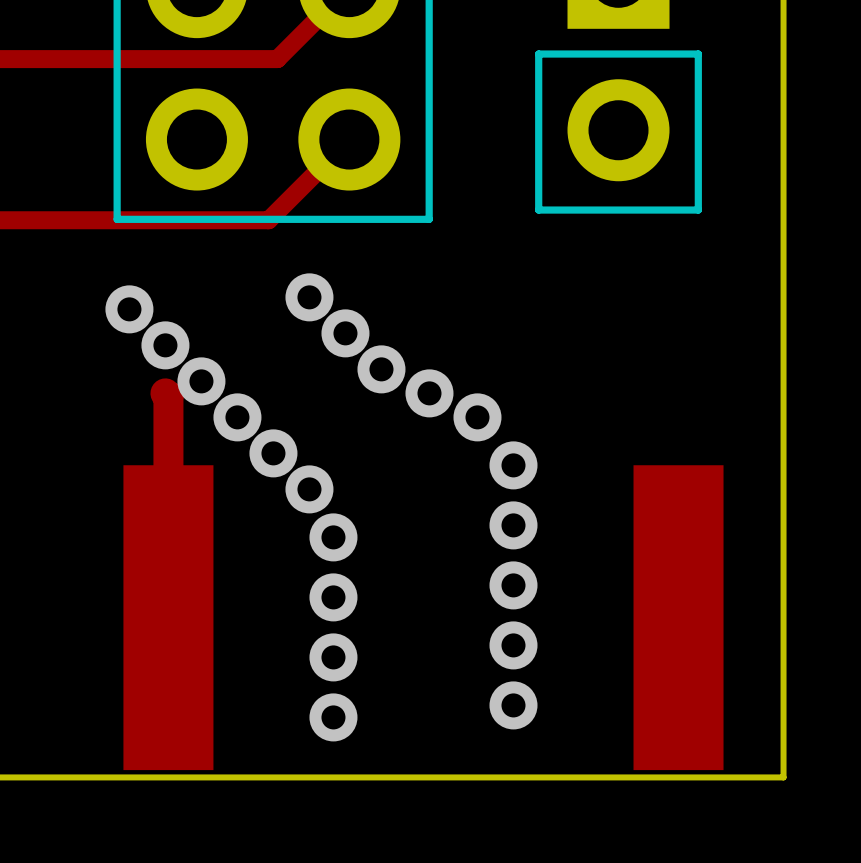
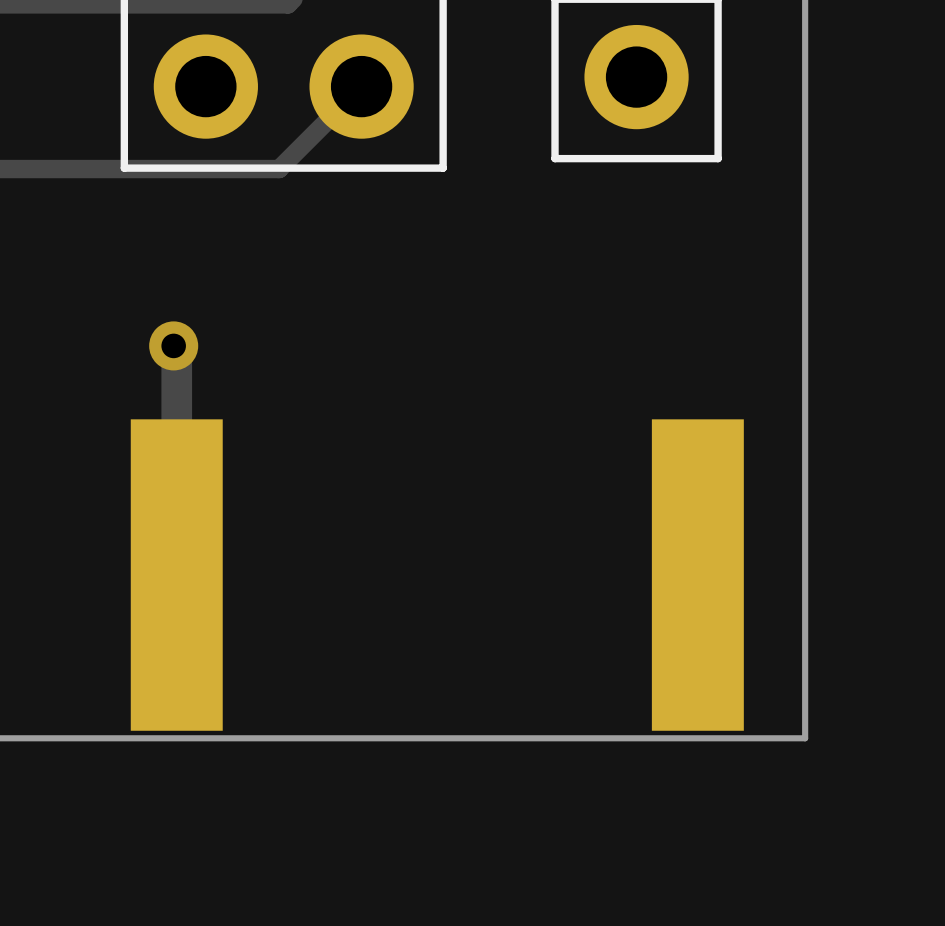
via: (309, 297) -> none
via: (129, 309) -> none
via: (345, 333) -> none
via: (165, 345) -> none
via: (381, 369) -> none
via: (201, 381) -> none
via: none -> (173, 345)
via: (429, 393) -> none
via: (237, 417) -> none
via: (477, 417) -> none
via: (273, 453) -> none
via: (513, 465) -> none
via: (309, 489) -> none
via: (513, 525) -> none
via: (333, 537) -> none
via: (513, 585) -> none
via: (333, 597) -> none
via: (513, 645) -> none
via: (333, 657) -> none
via: (513, 705) -> none
via: (333, 717) -> none

